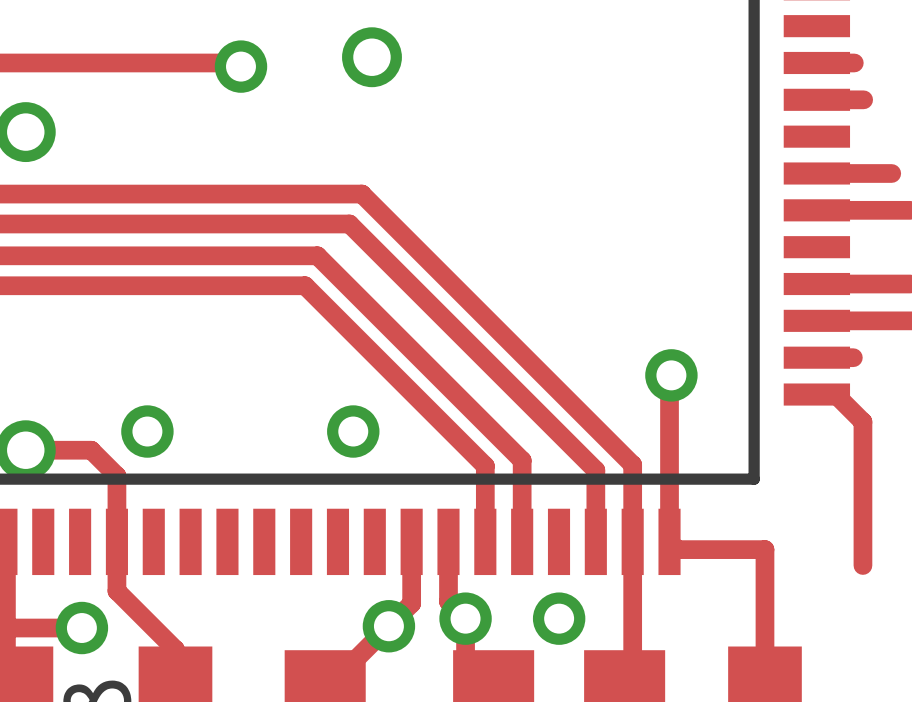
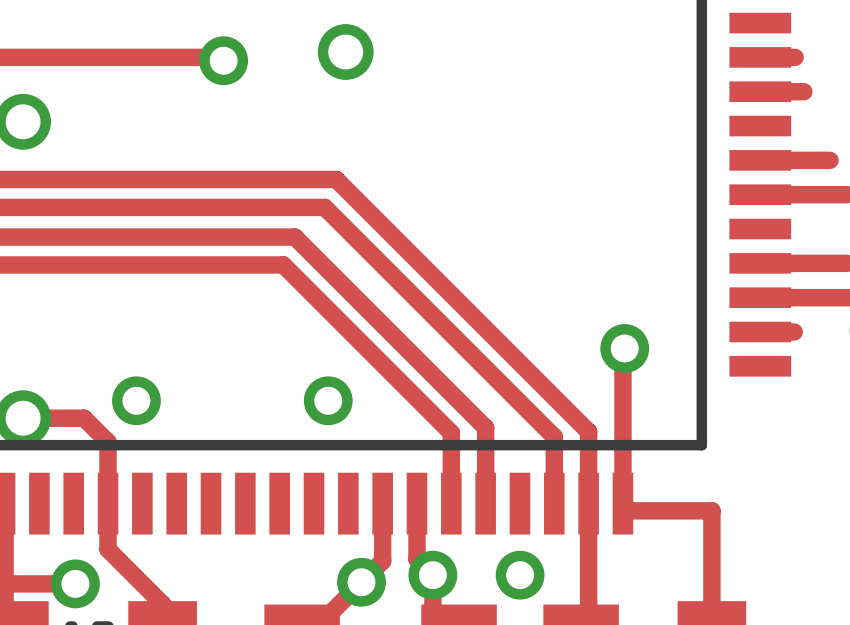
track: (835, 394) (862, 421) (862, 565) -> none

